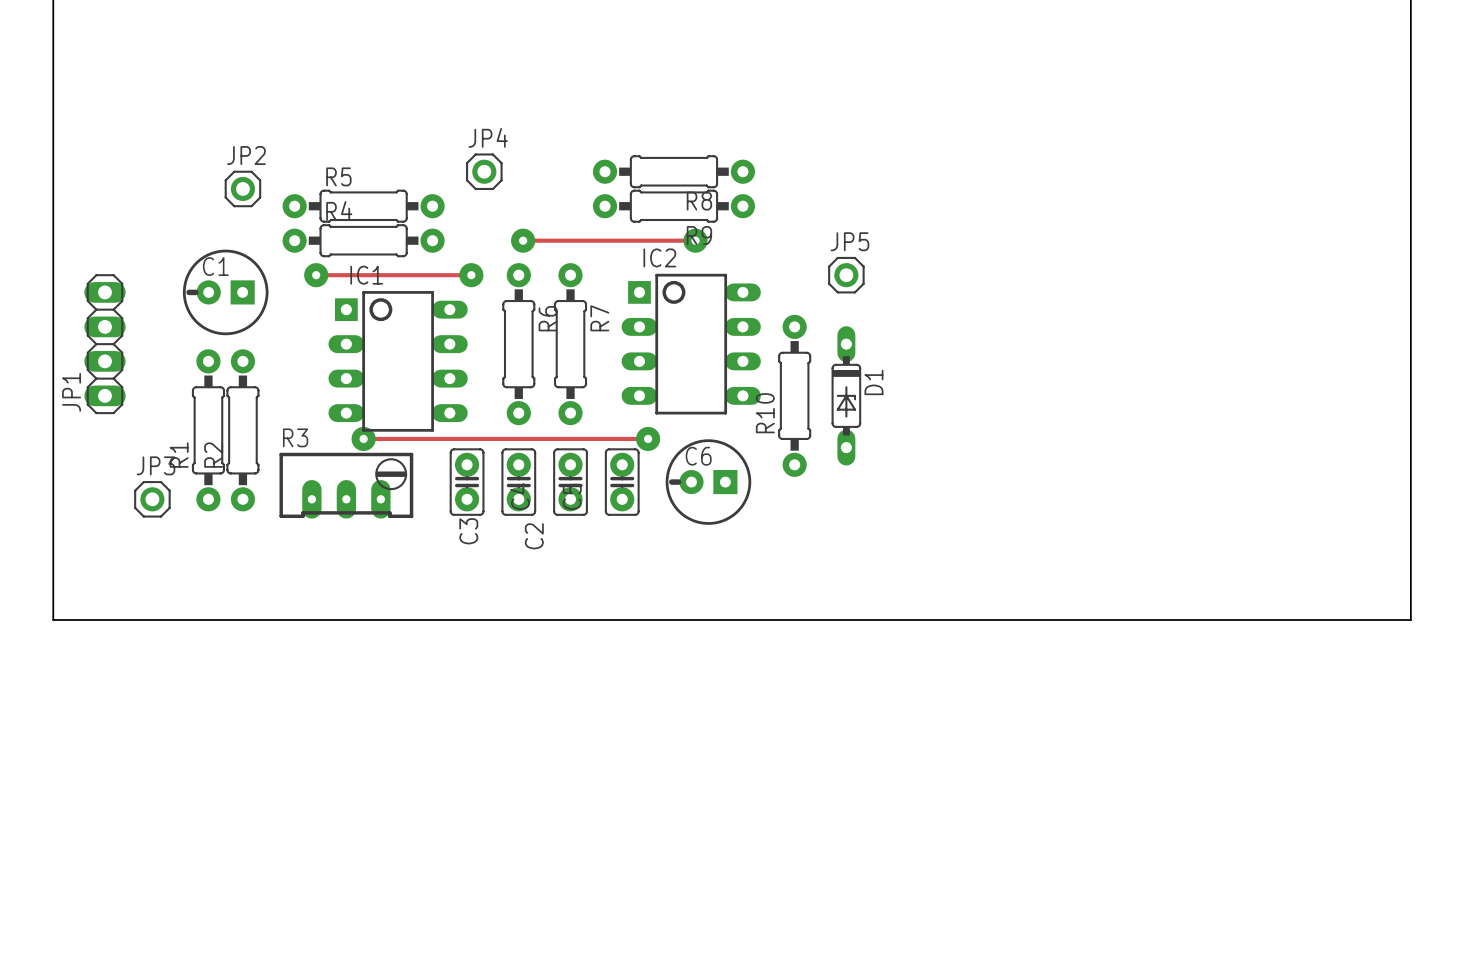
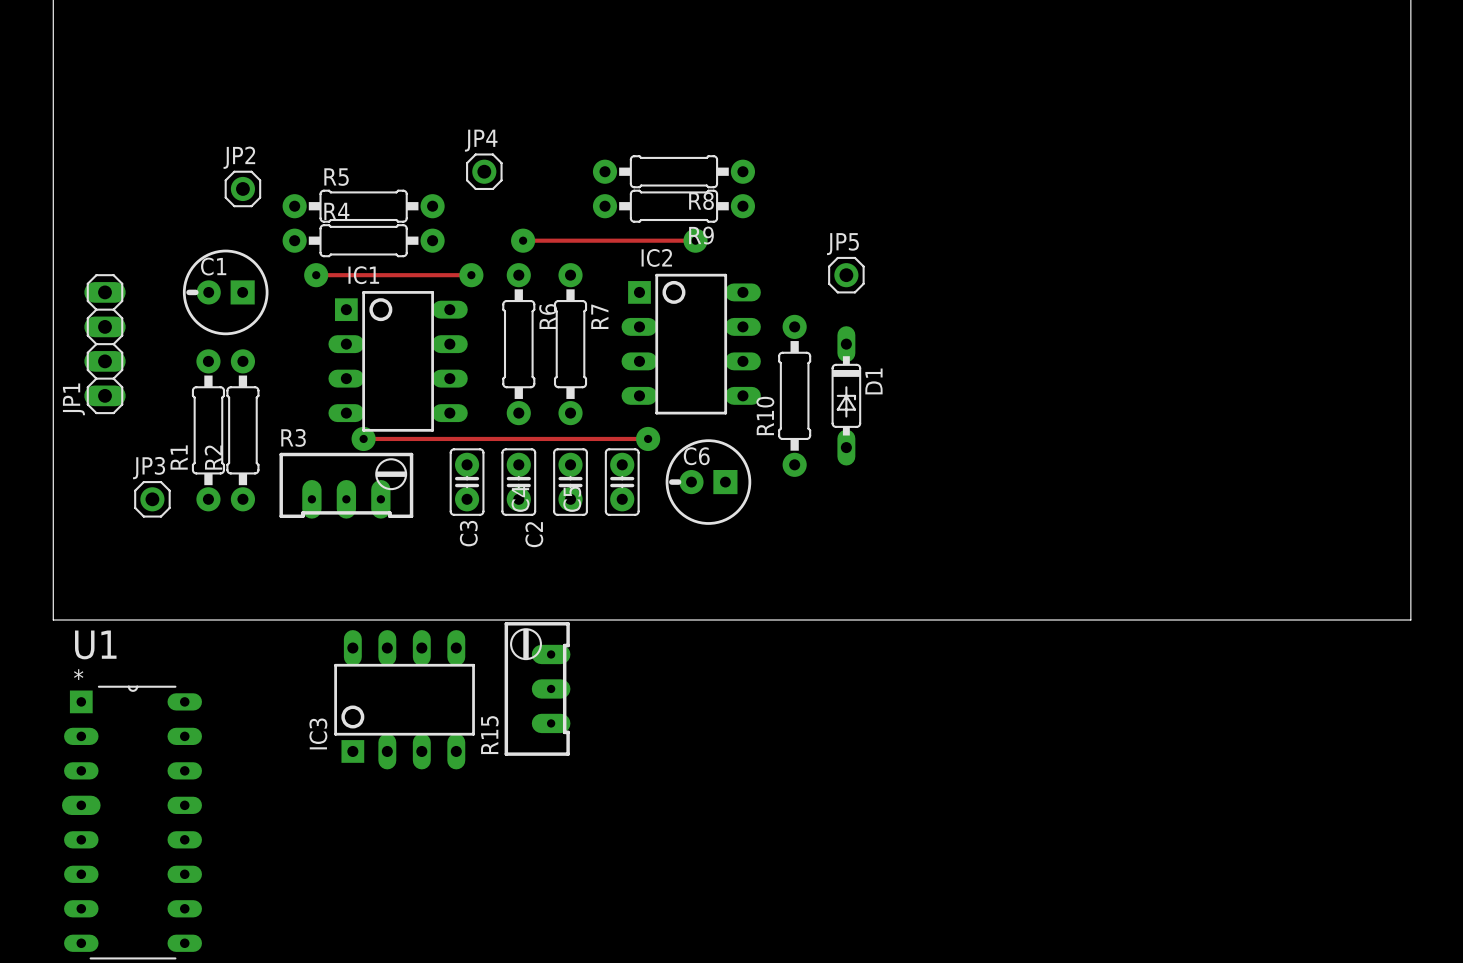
R15: none -> (537, 688)
IC3: none -> (404, 699)
U1: none -> (131, 822)

